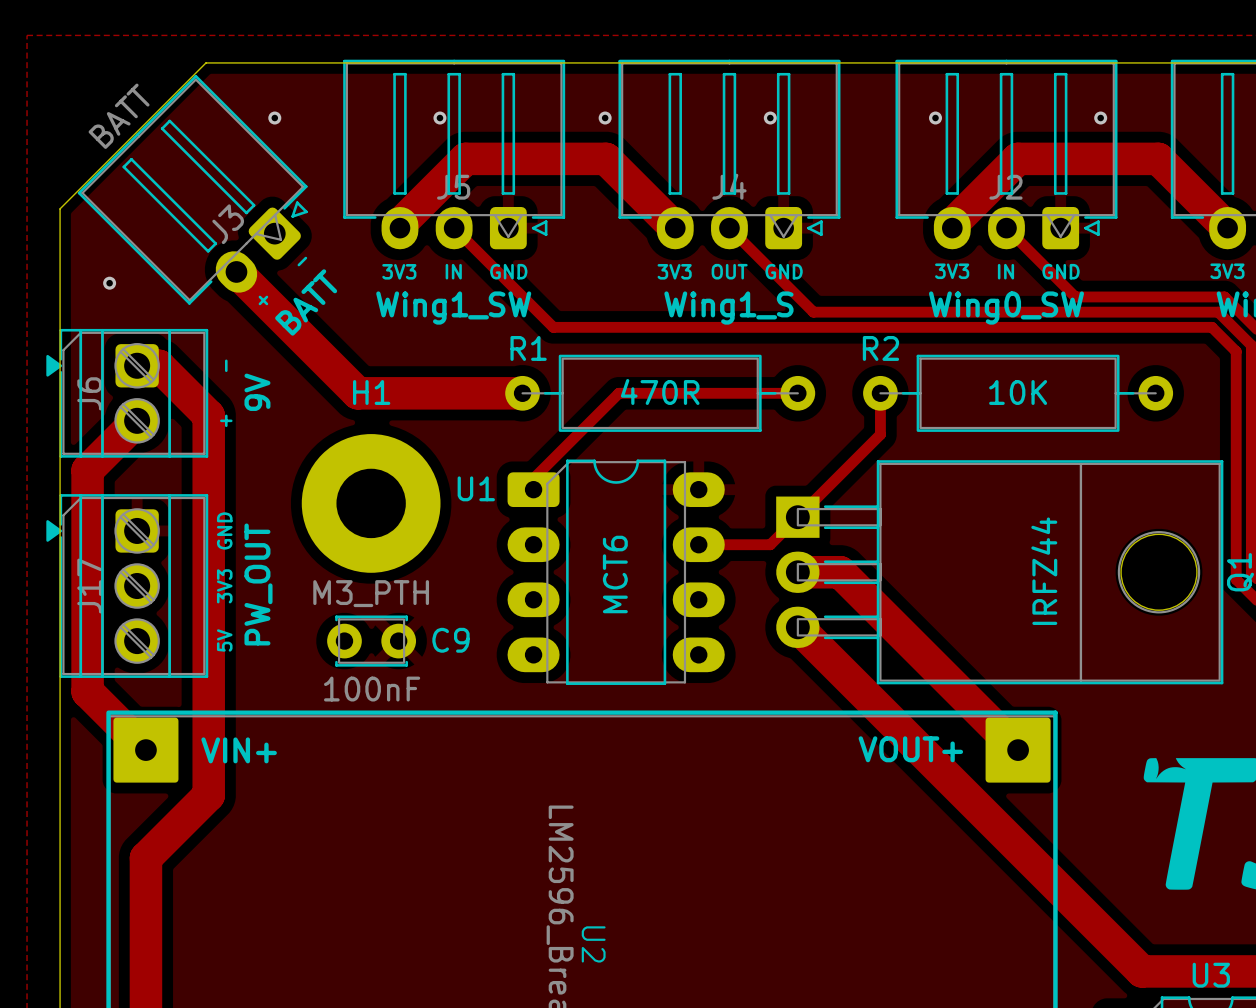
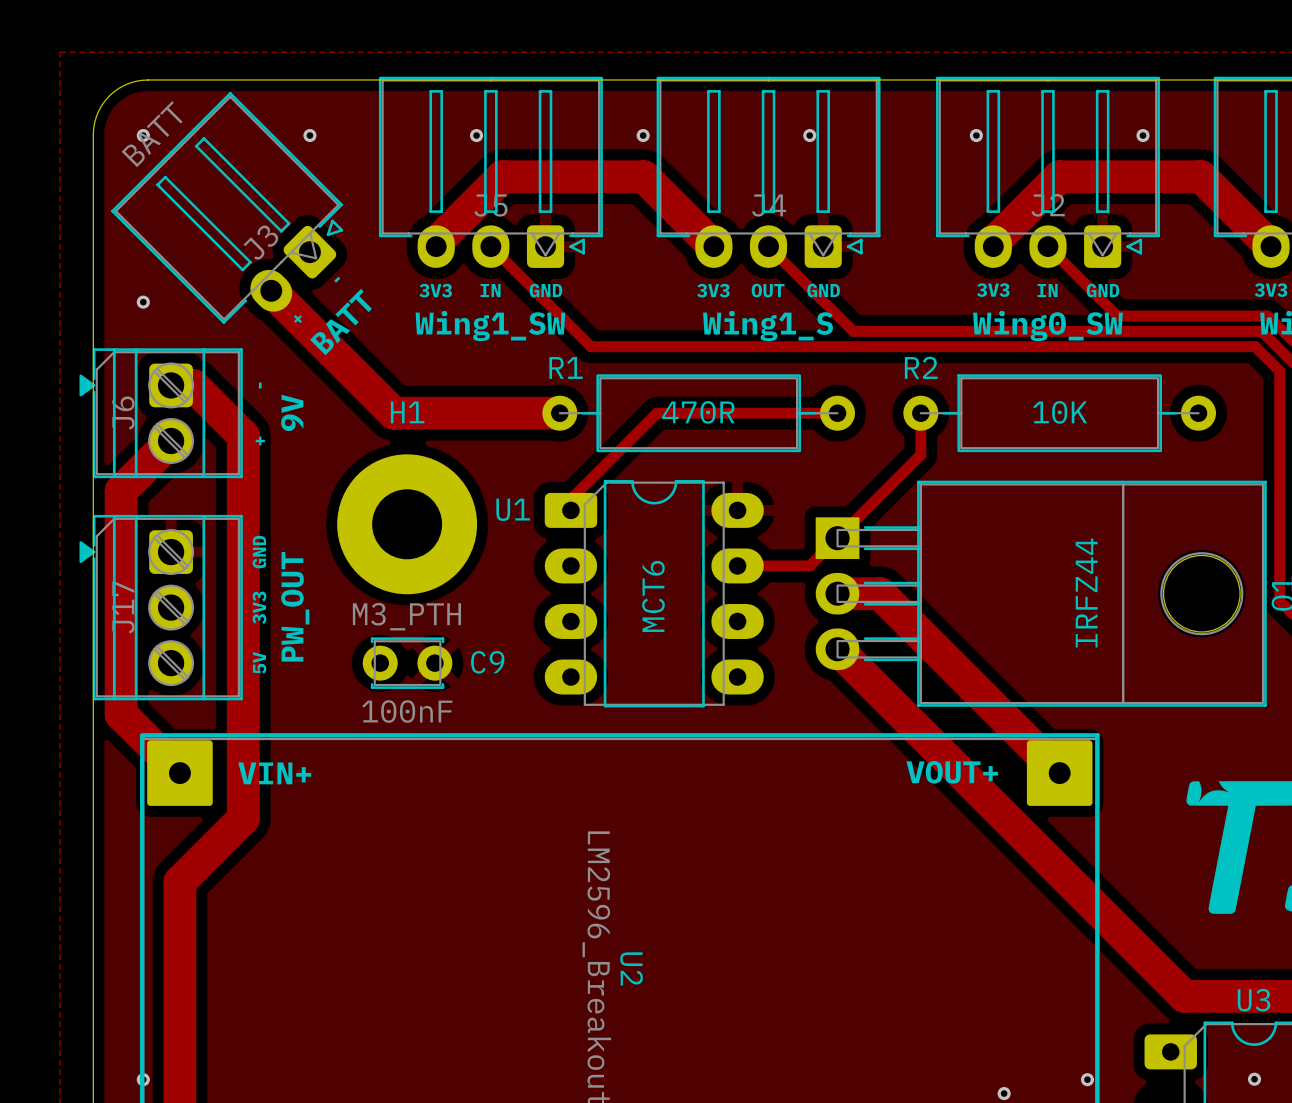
board edge: (205, 62) (60, 208) -> (240, 79) (141, 80) (124, 85) (109, 96) (98, 110) (93, 128) (93, 227)
via: none -> (143, 135)

